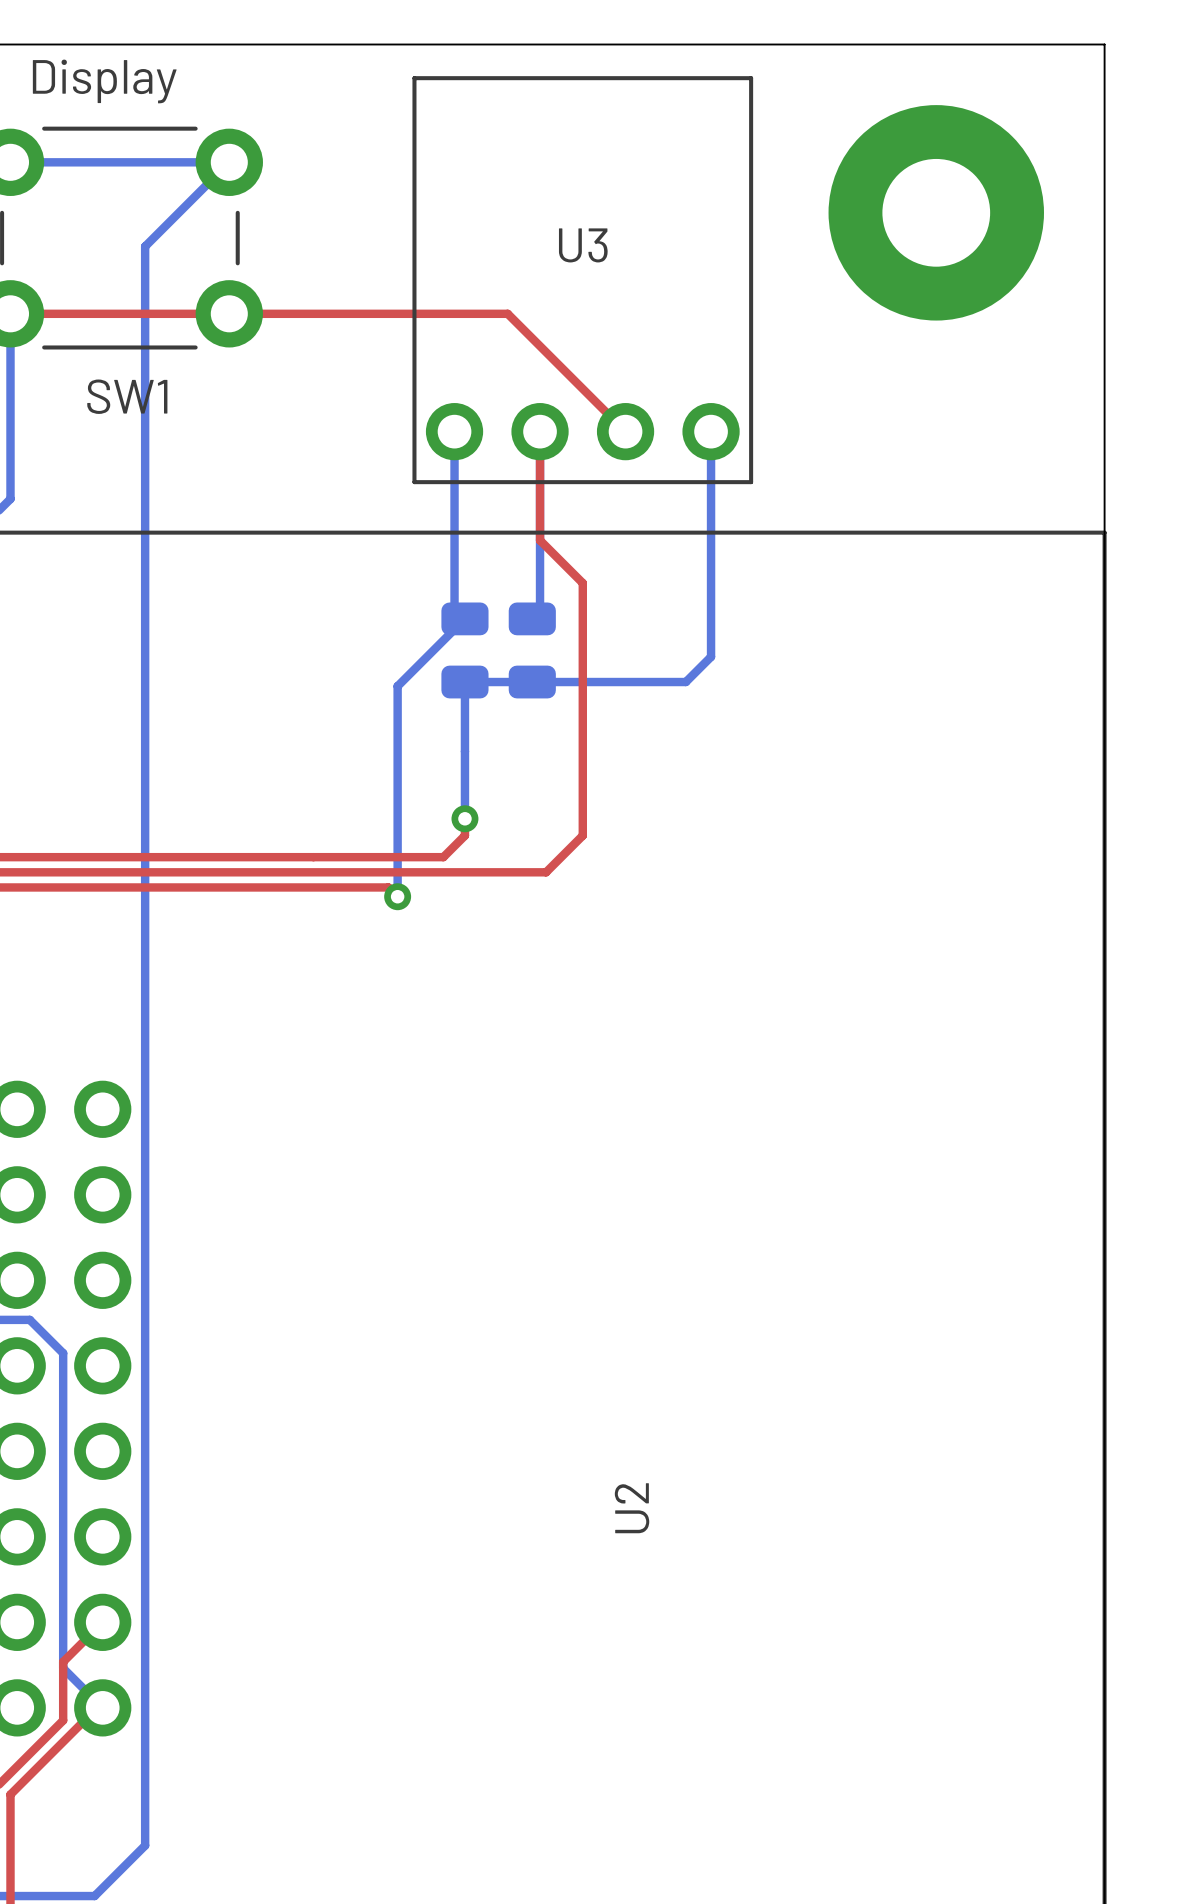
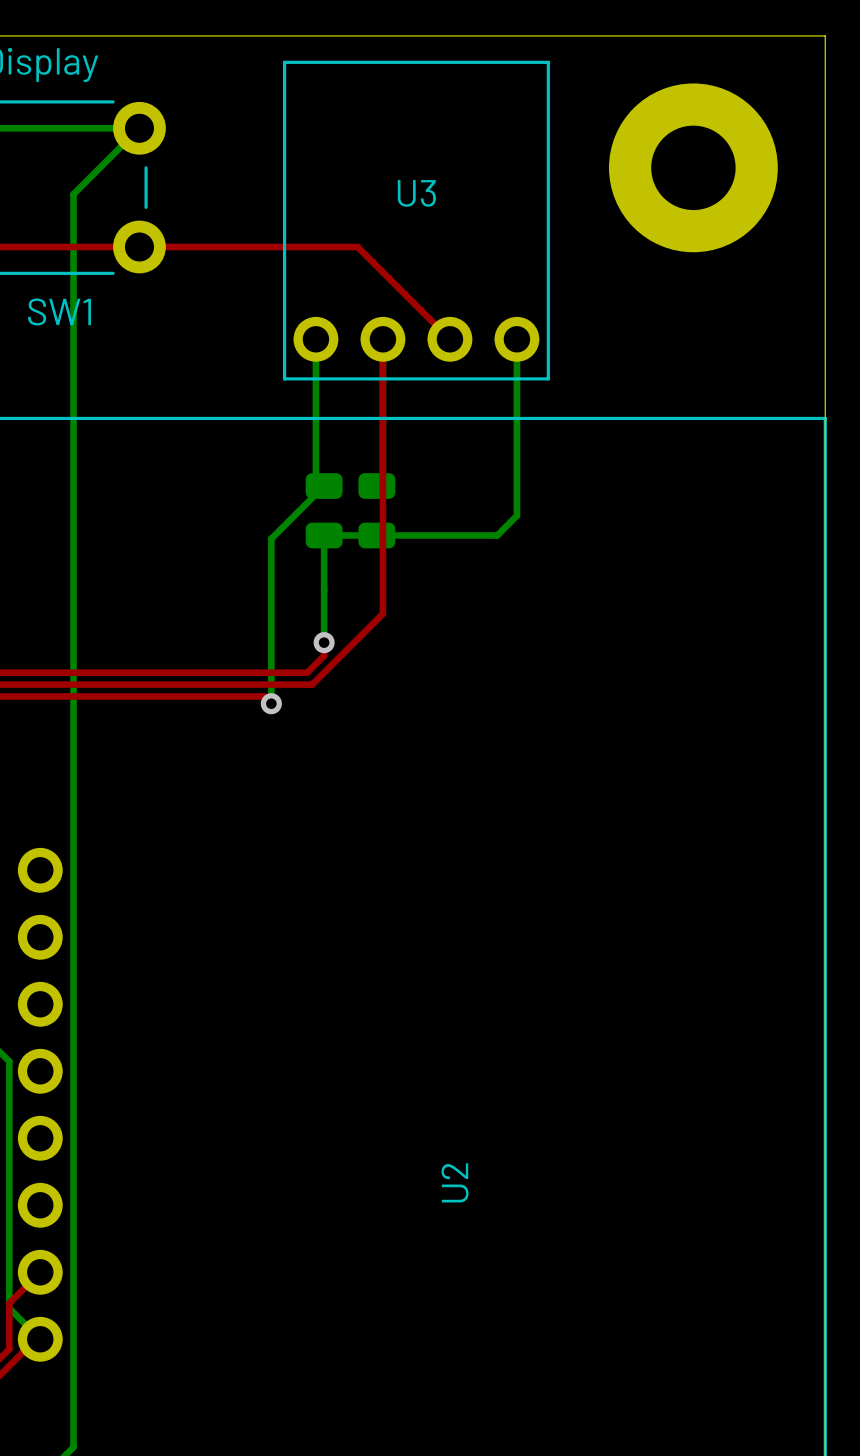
top track: (540, 540) (582, 583) (582, 835) (546, 872) (449, 872) -> (382, 424) (382, 613) (312, 684)

